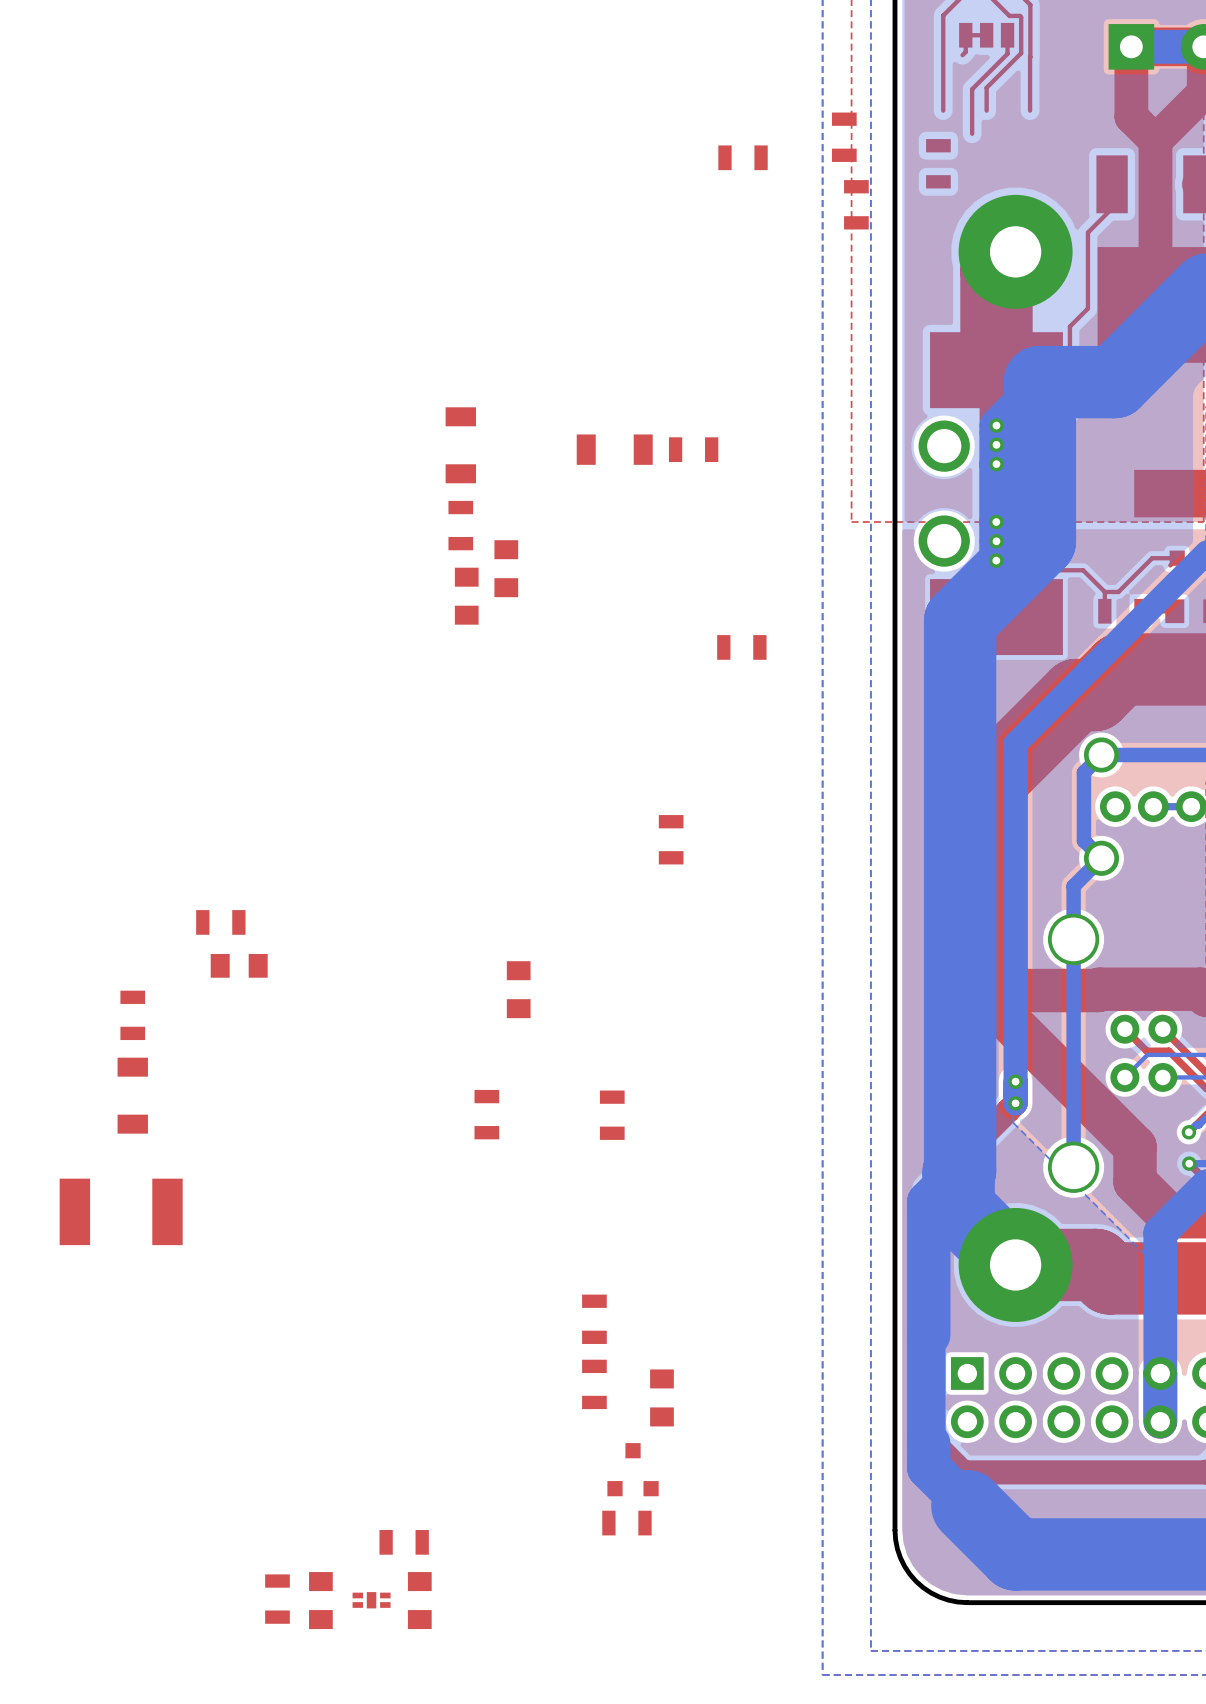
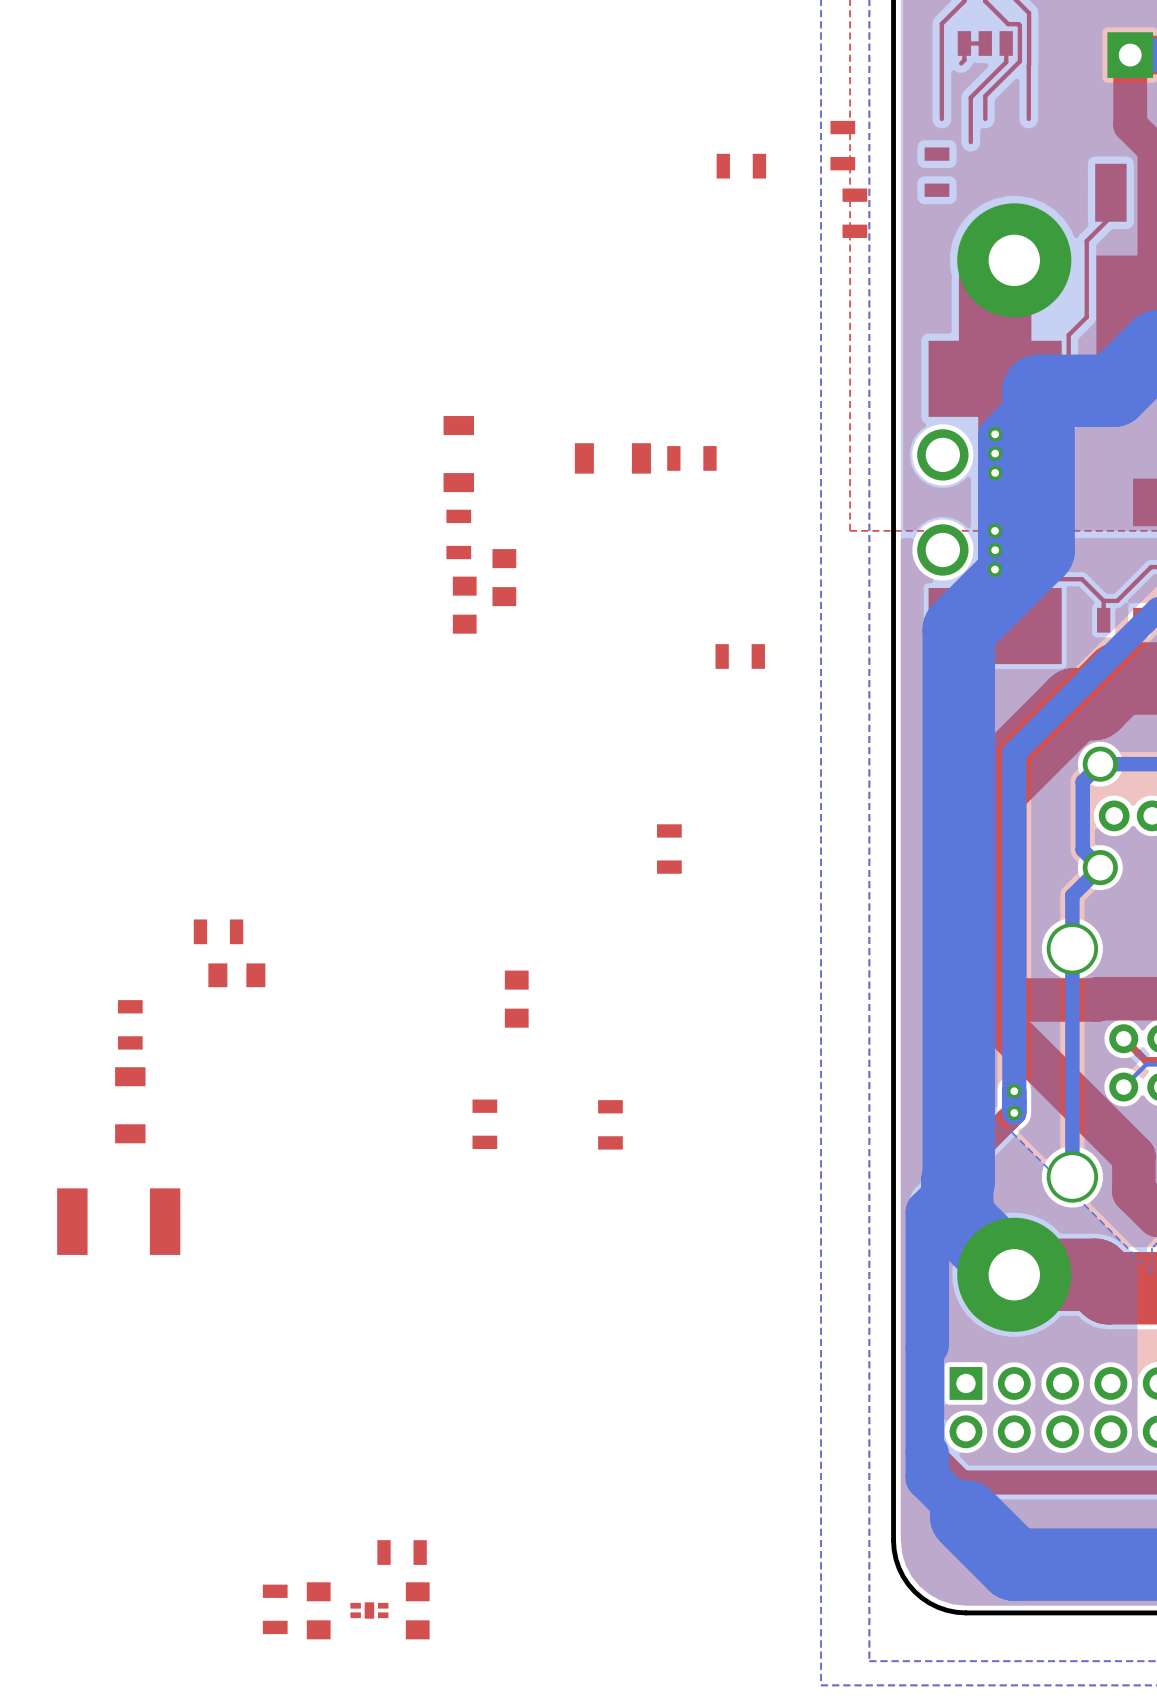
part: (594, 1319) -> none
part: (594, 1384) -> none
part: (661, 1397) -> none
part: (633, 1469) -> none
part: (626, 1523) -> none

